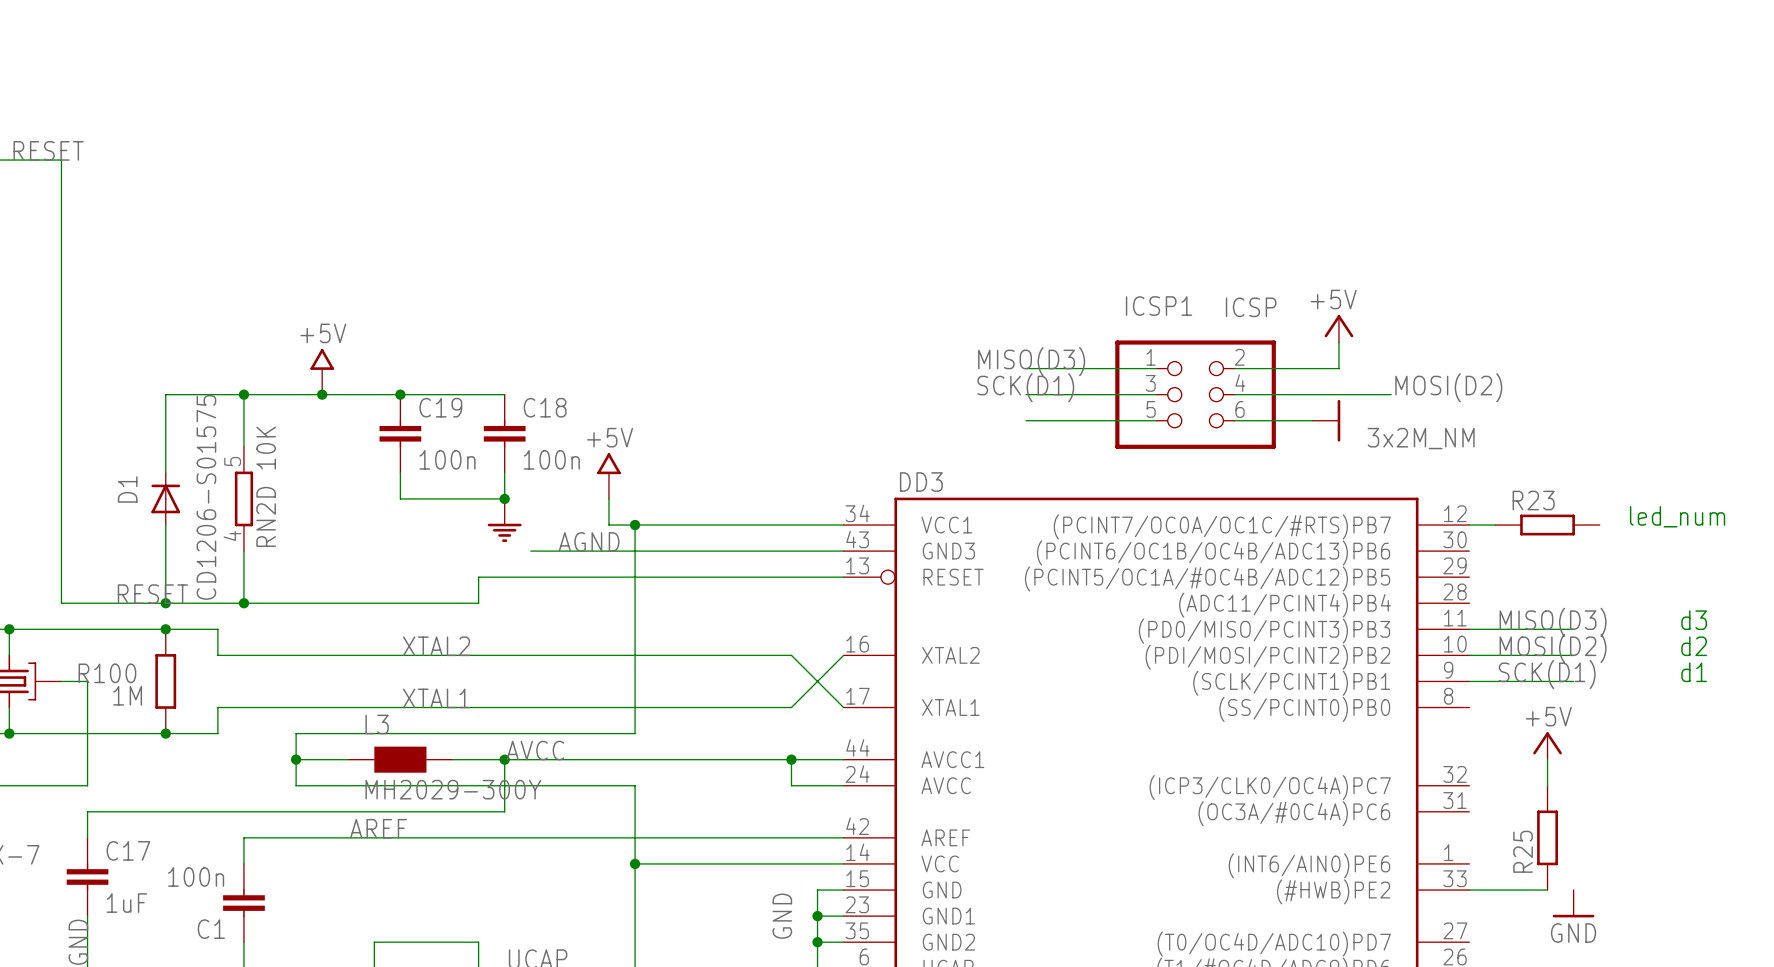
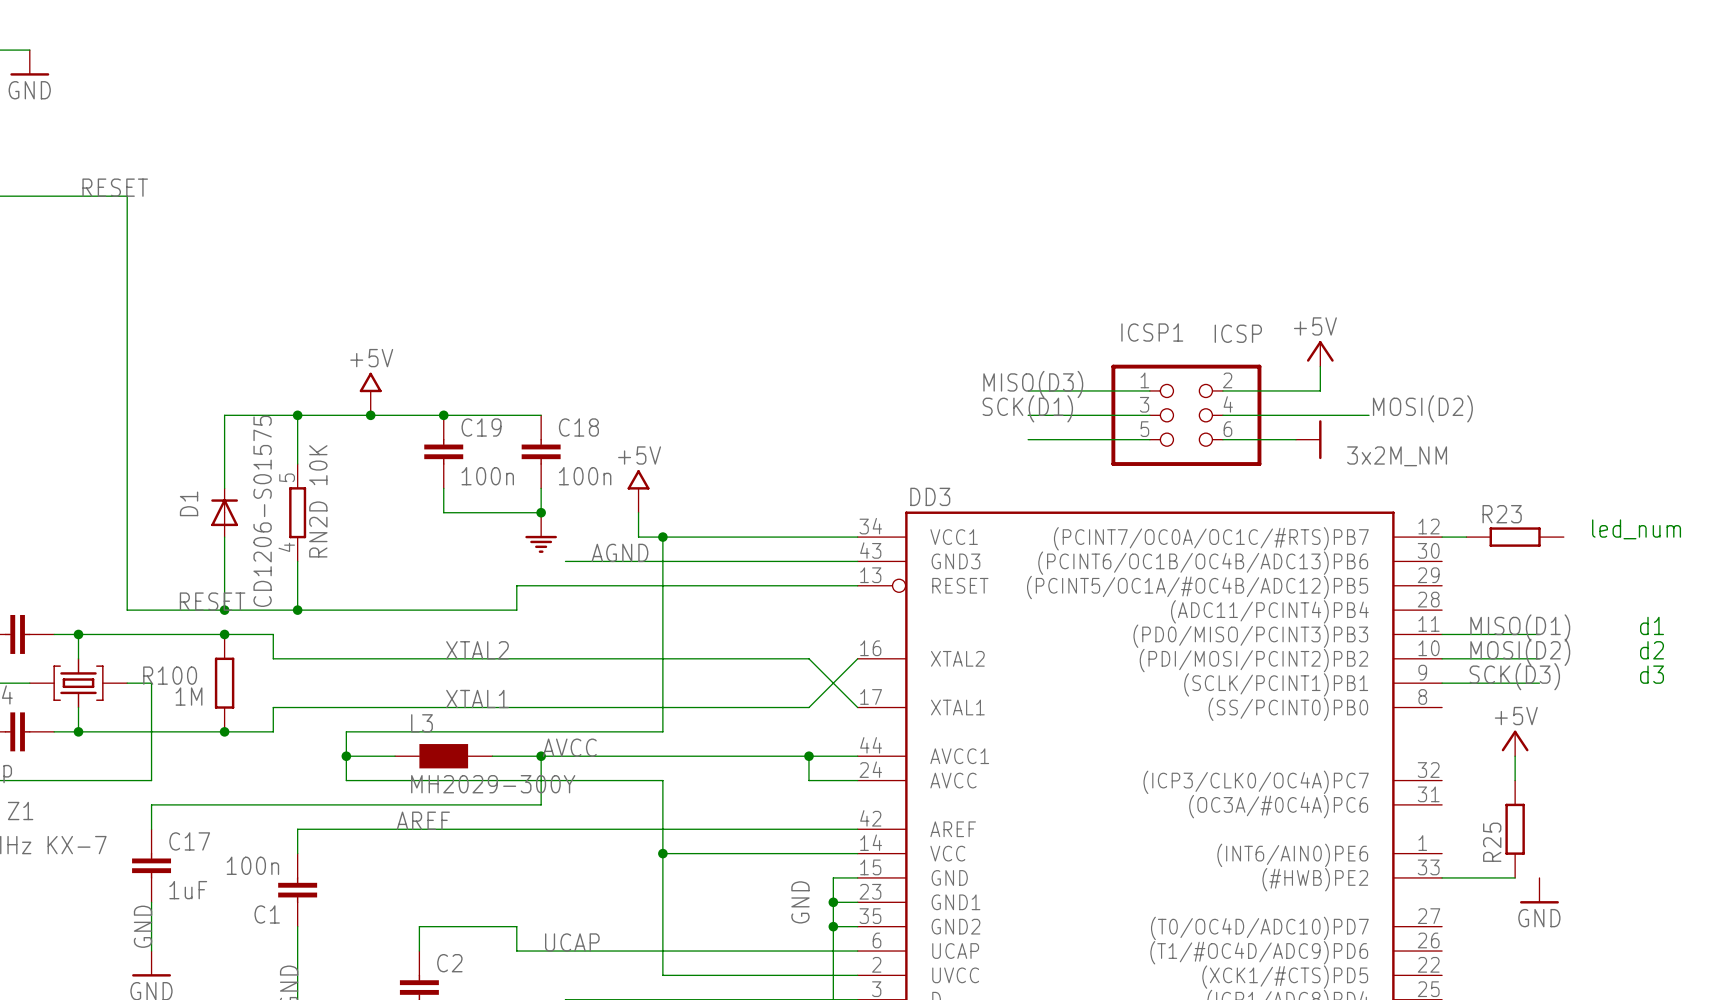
text: d3 (1694, 620) -> d1 (1652, 625)
label: MISO(D3) (1553, 622) -> MISO(D1) (1520, 627)
text: d1 (1694, 672) -> d3 (1652, 674)
label: SCK(D1) (1547, 674) -> SCK(D3) (1514, 676)

